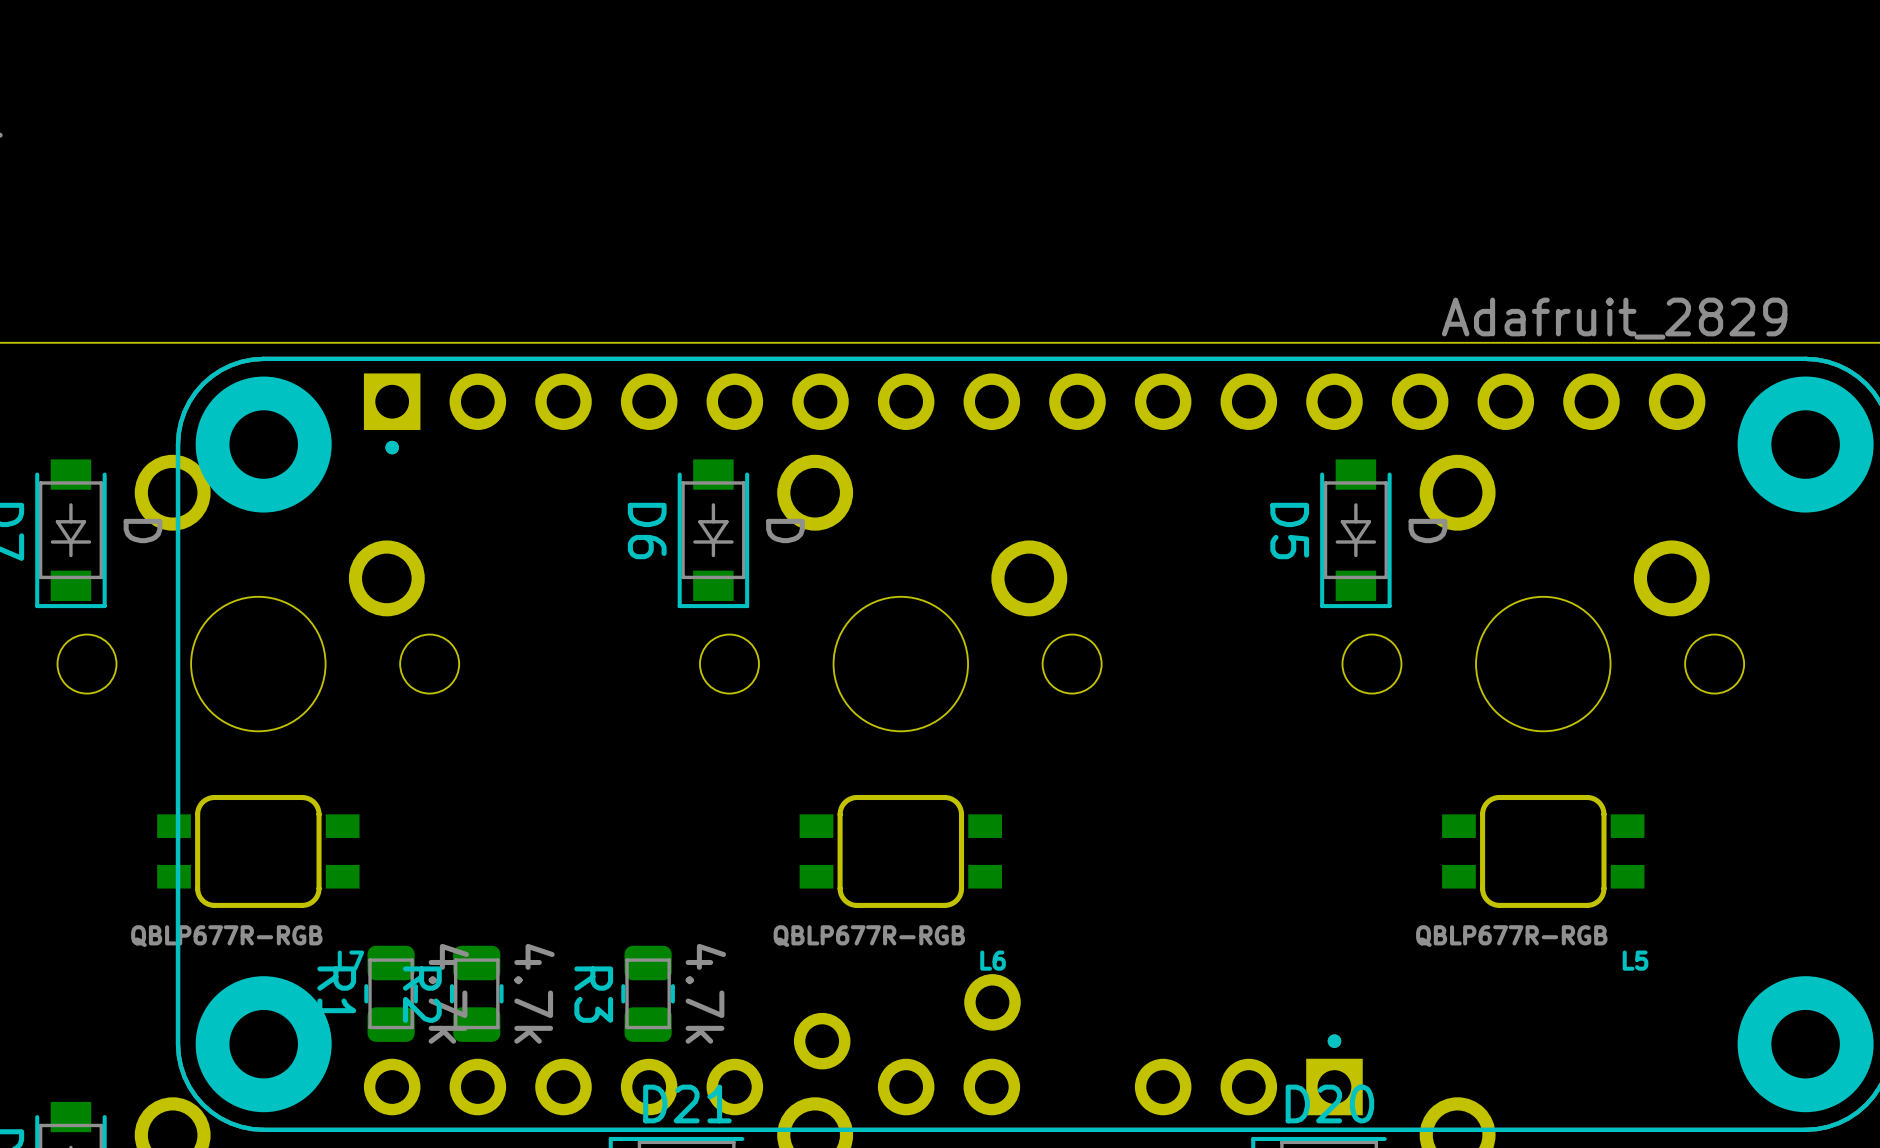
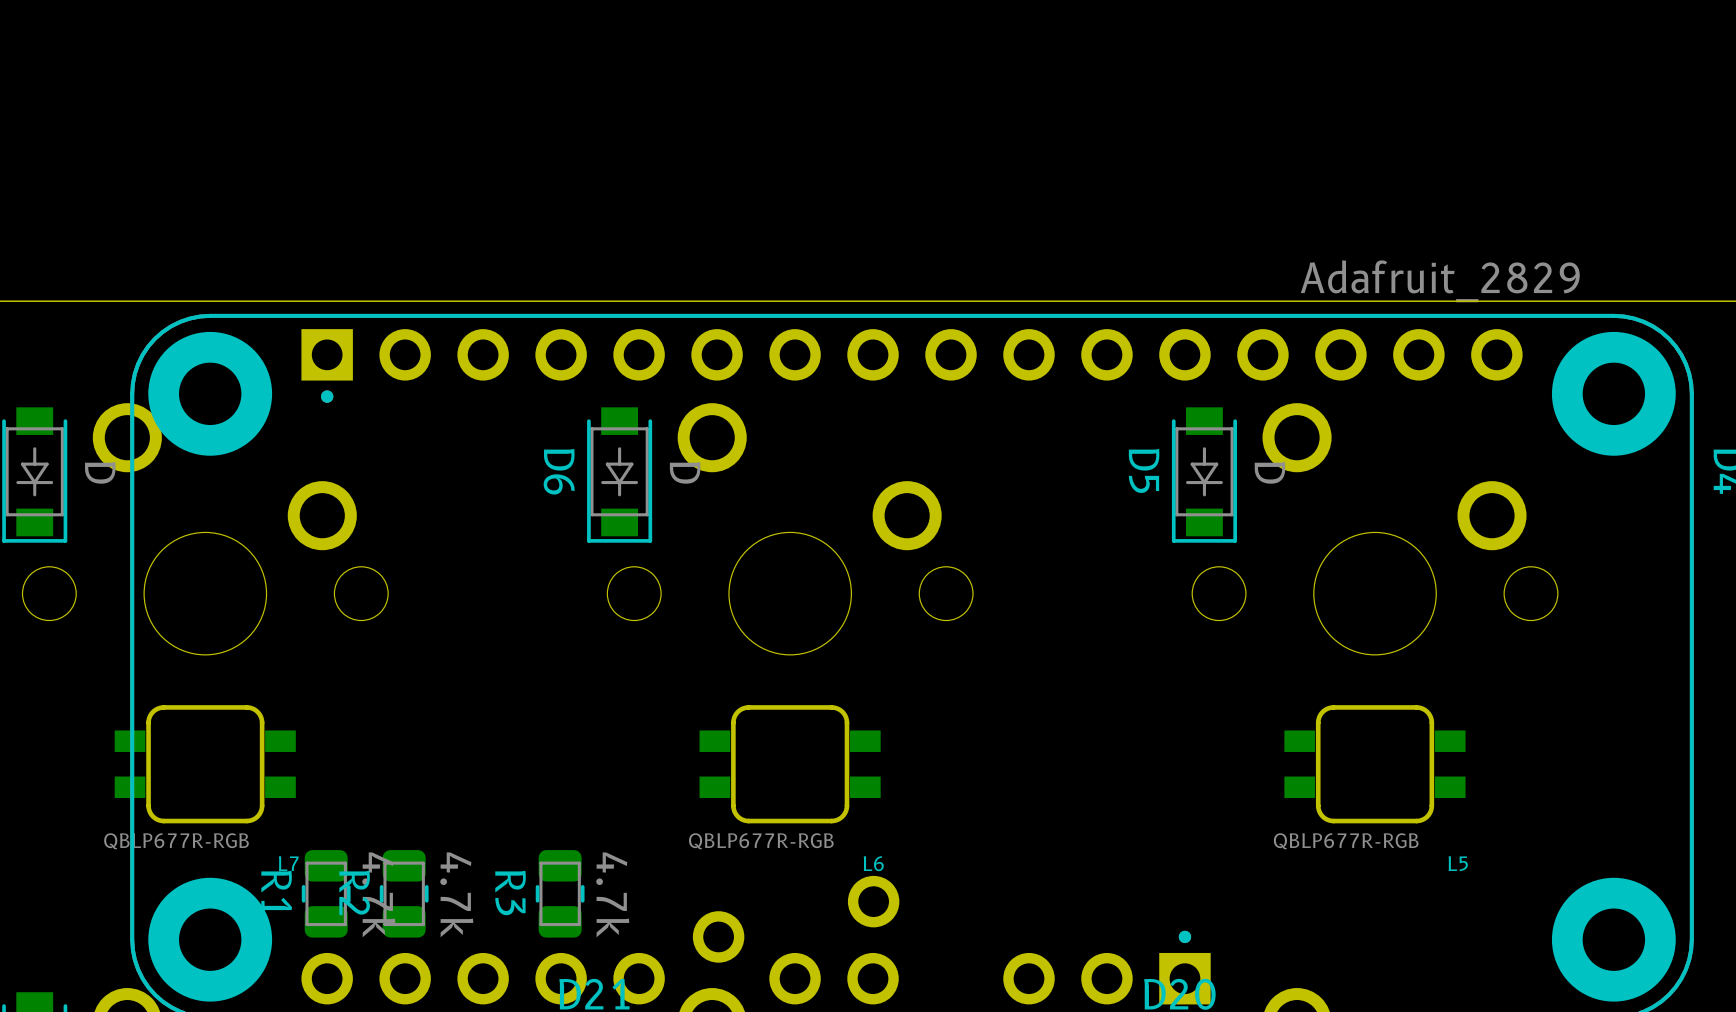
L7 footprint: [157, 794, 360, 908] -> [114, 705, 296, 824]
L6 footprint: [799, 794, 1002, 908] -> [699, 705, 881, 824]
L5 footprint: [1442, 794, 1645, 908] -> [1284, 705, 1466, 824]

